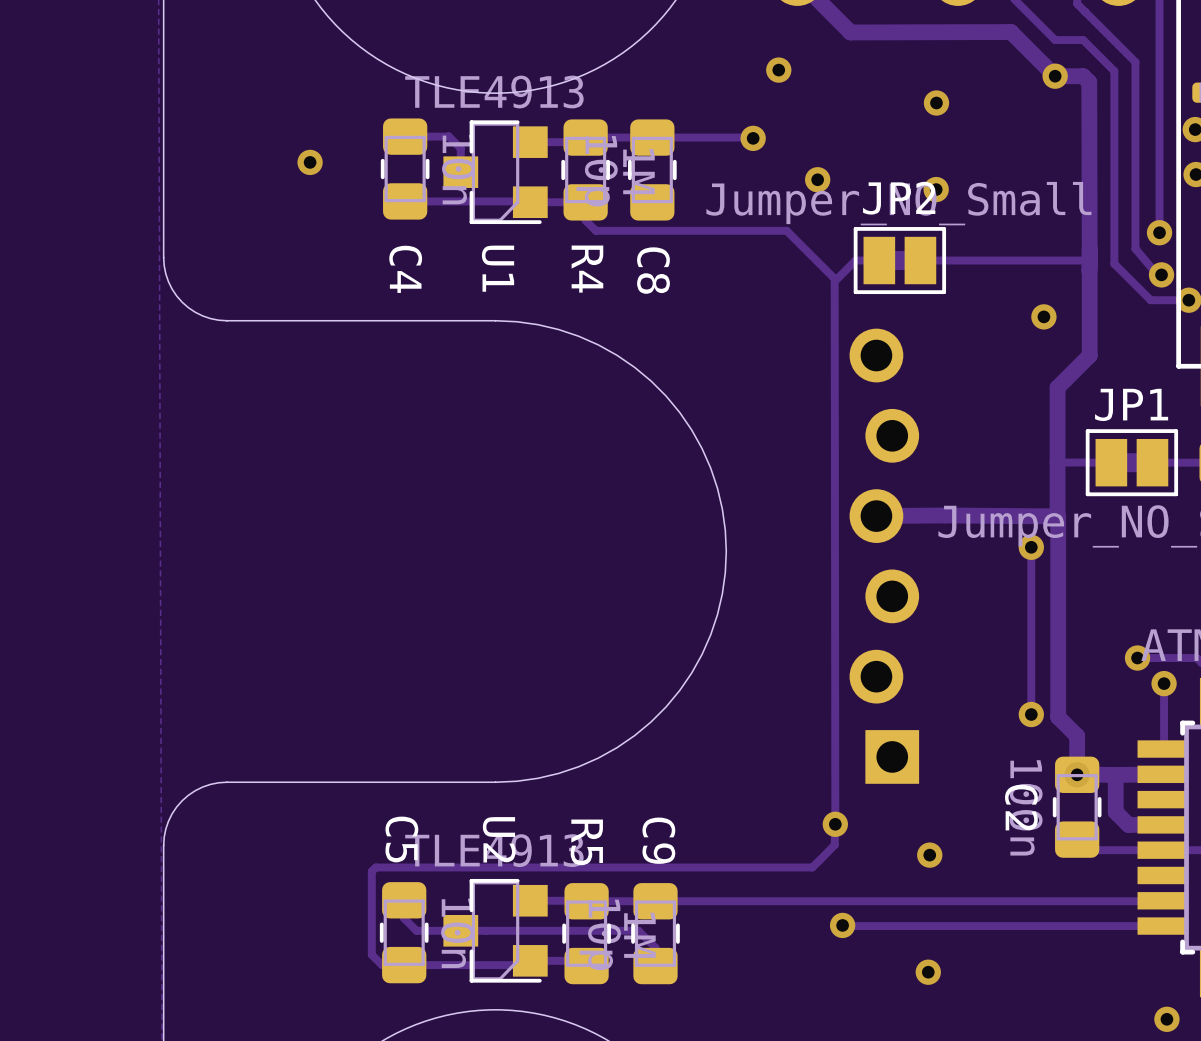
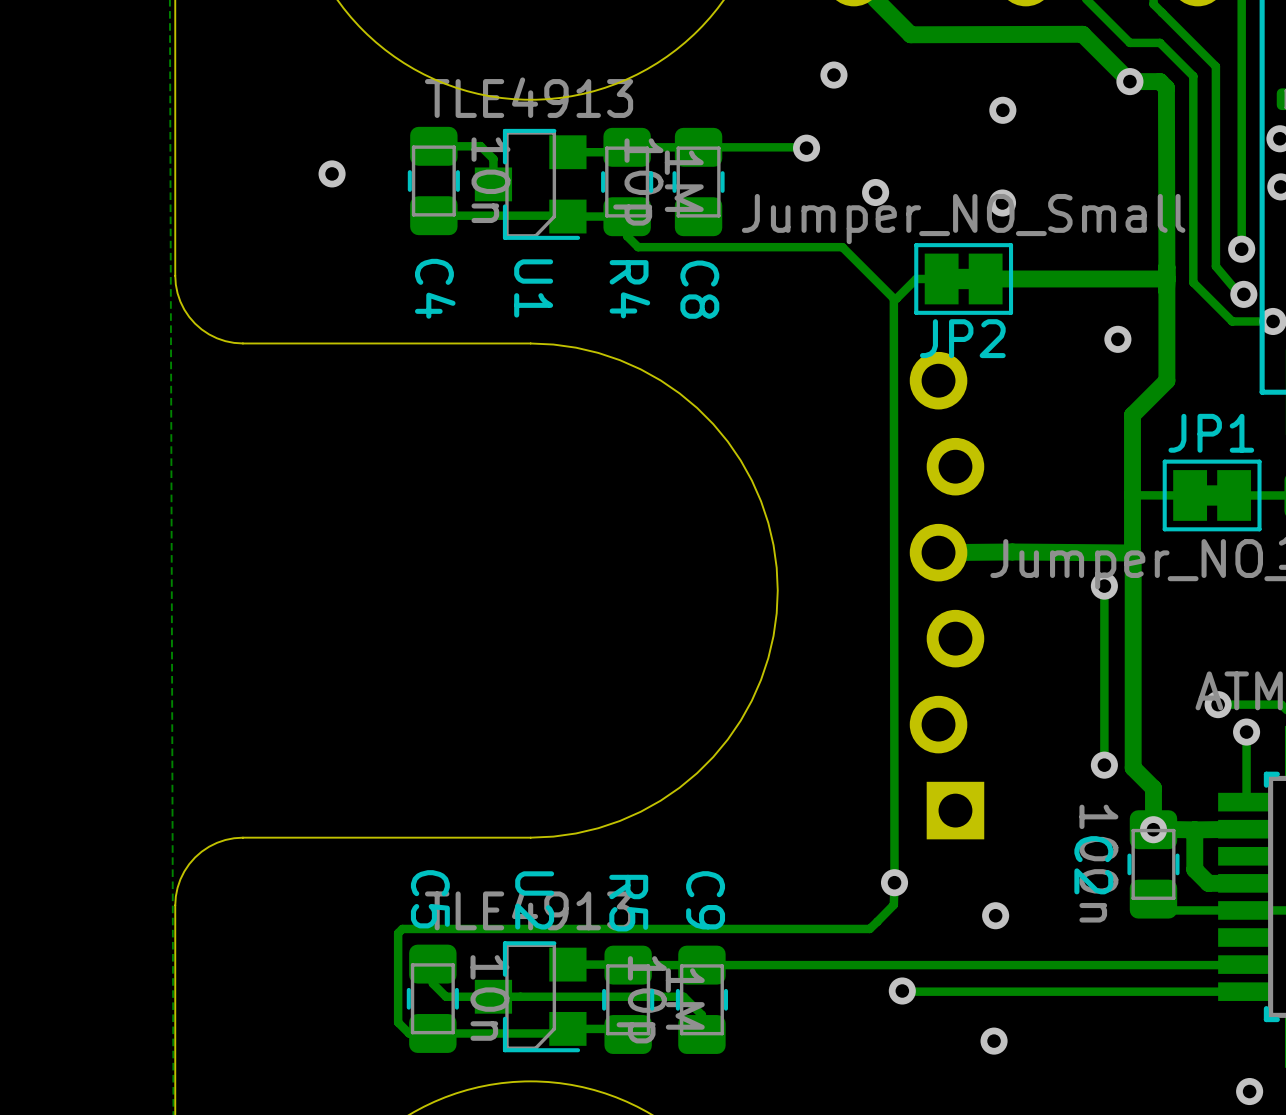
JP2 name position: JP2 (899, 198) -> JP2 (962, 338)
track width: thin (1089, 260) (920, 260) -> thick (1167, 278) (985, 278)

